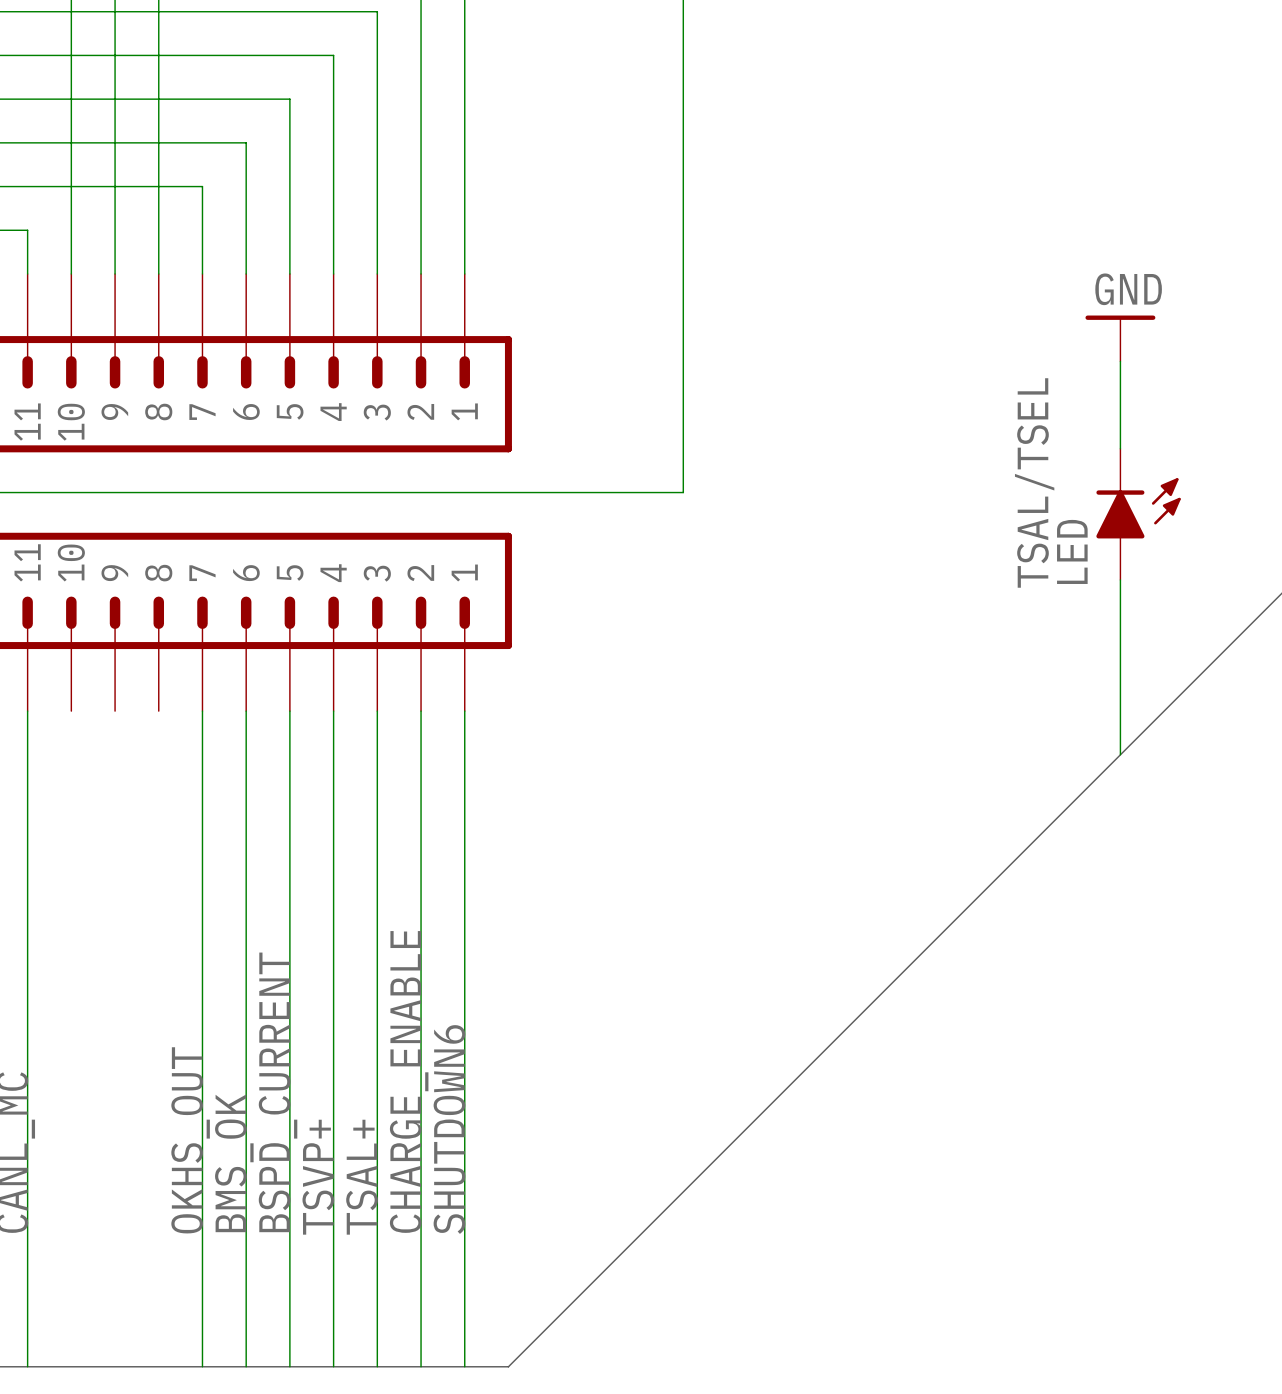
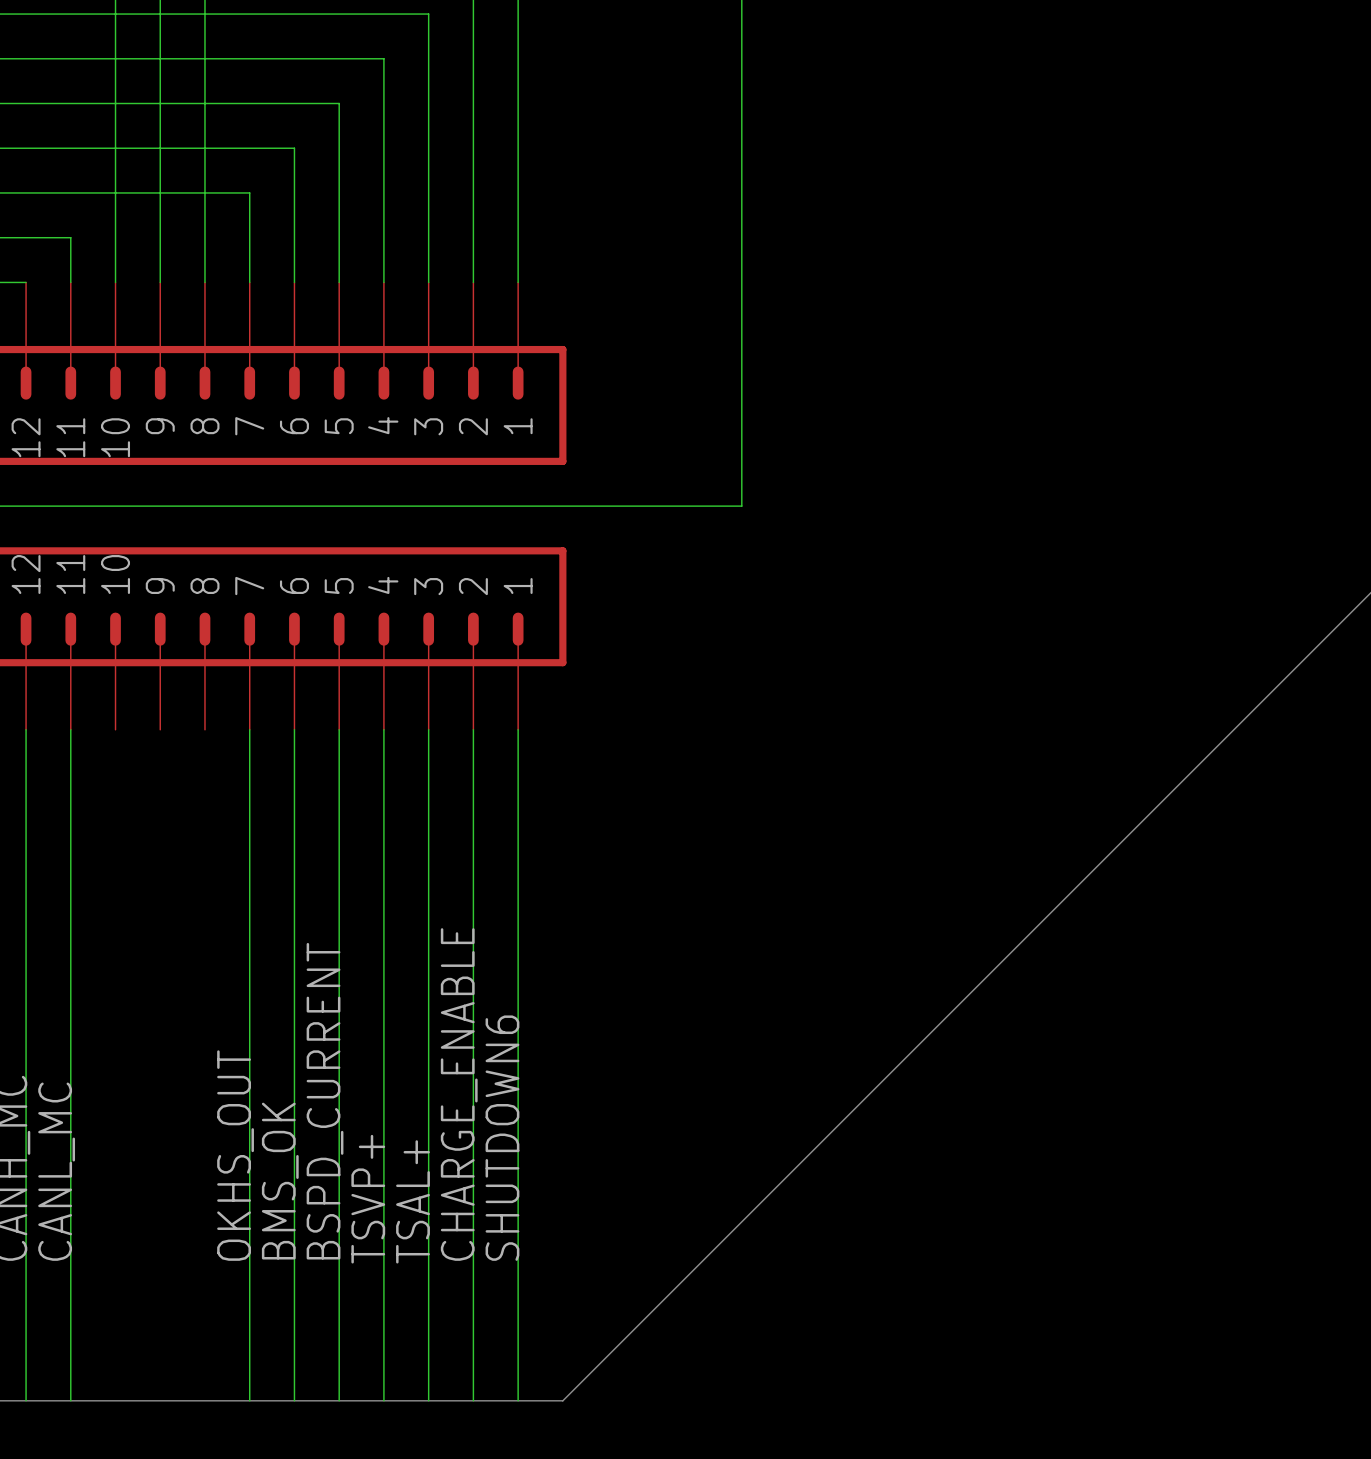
power symbol: GND (1120, 338) -> none
wire: (1120, 361) (1120, 448) -> none
TSAL/TSEL: LED (1138, 514) -> none
wire: (1120, 579) (1120, 754) -> none

